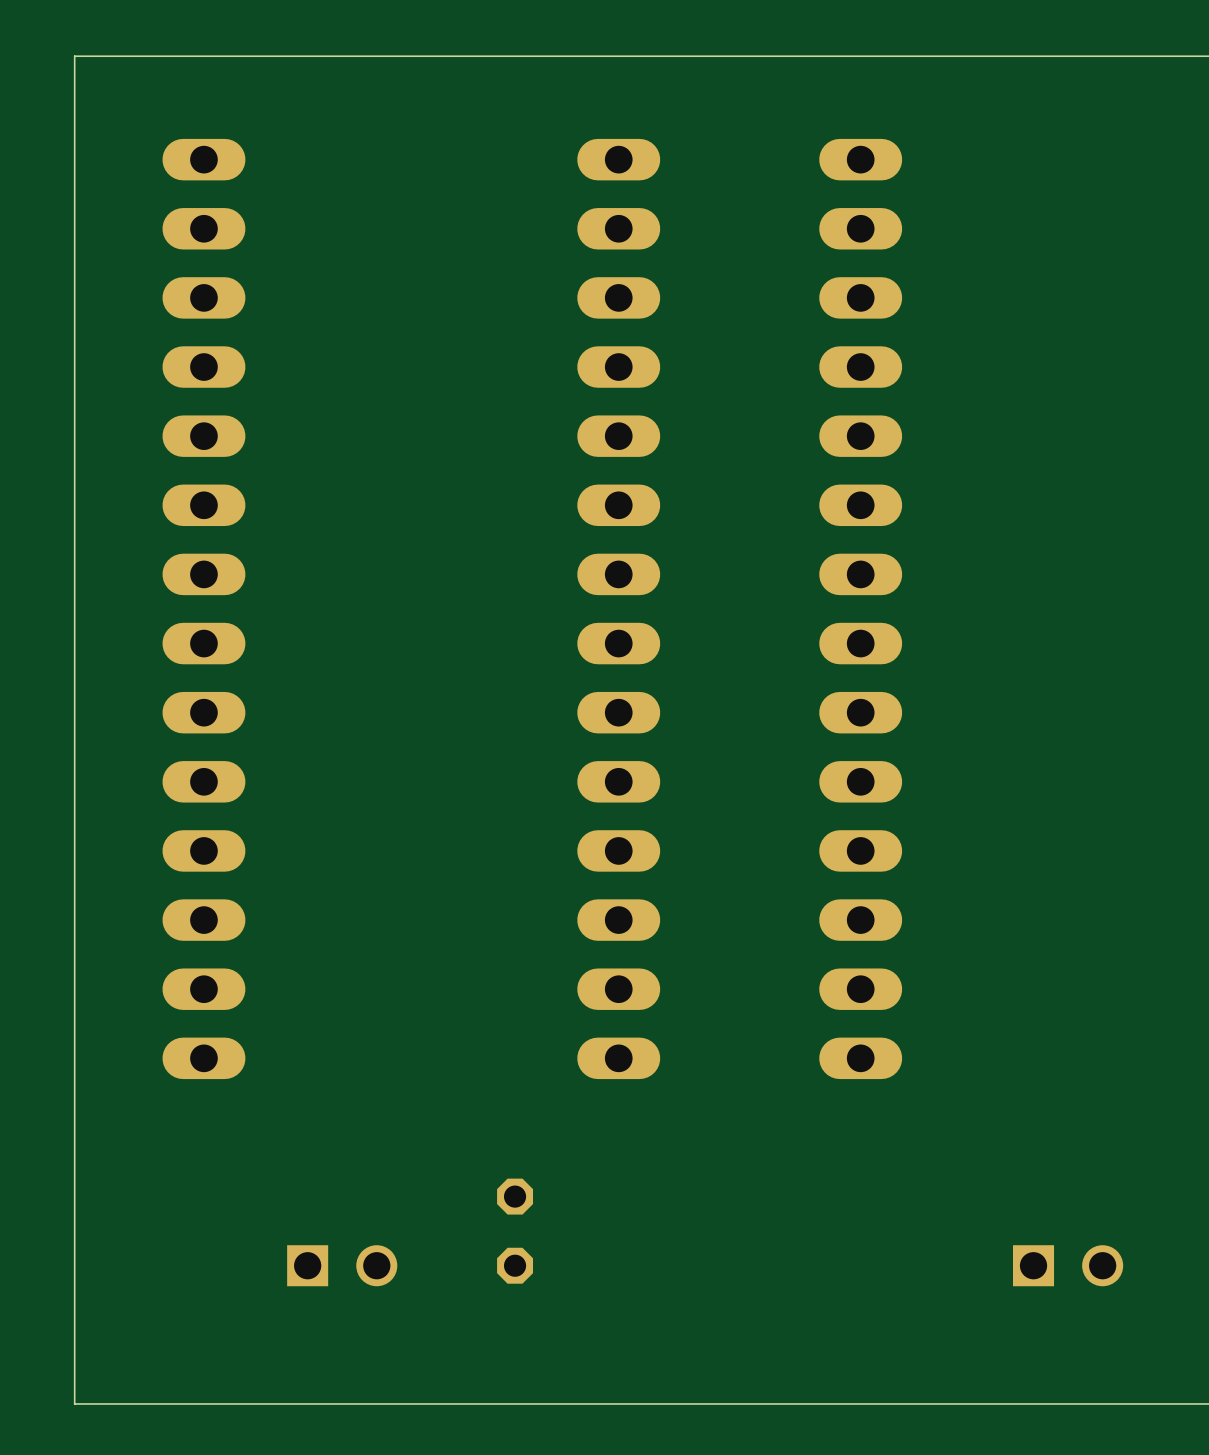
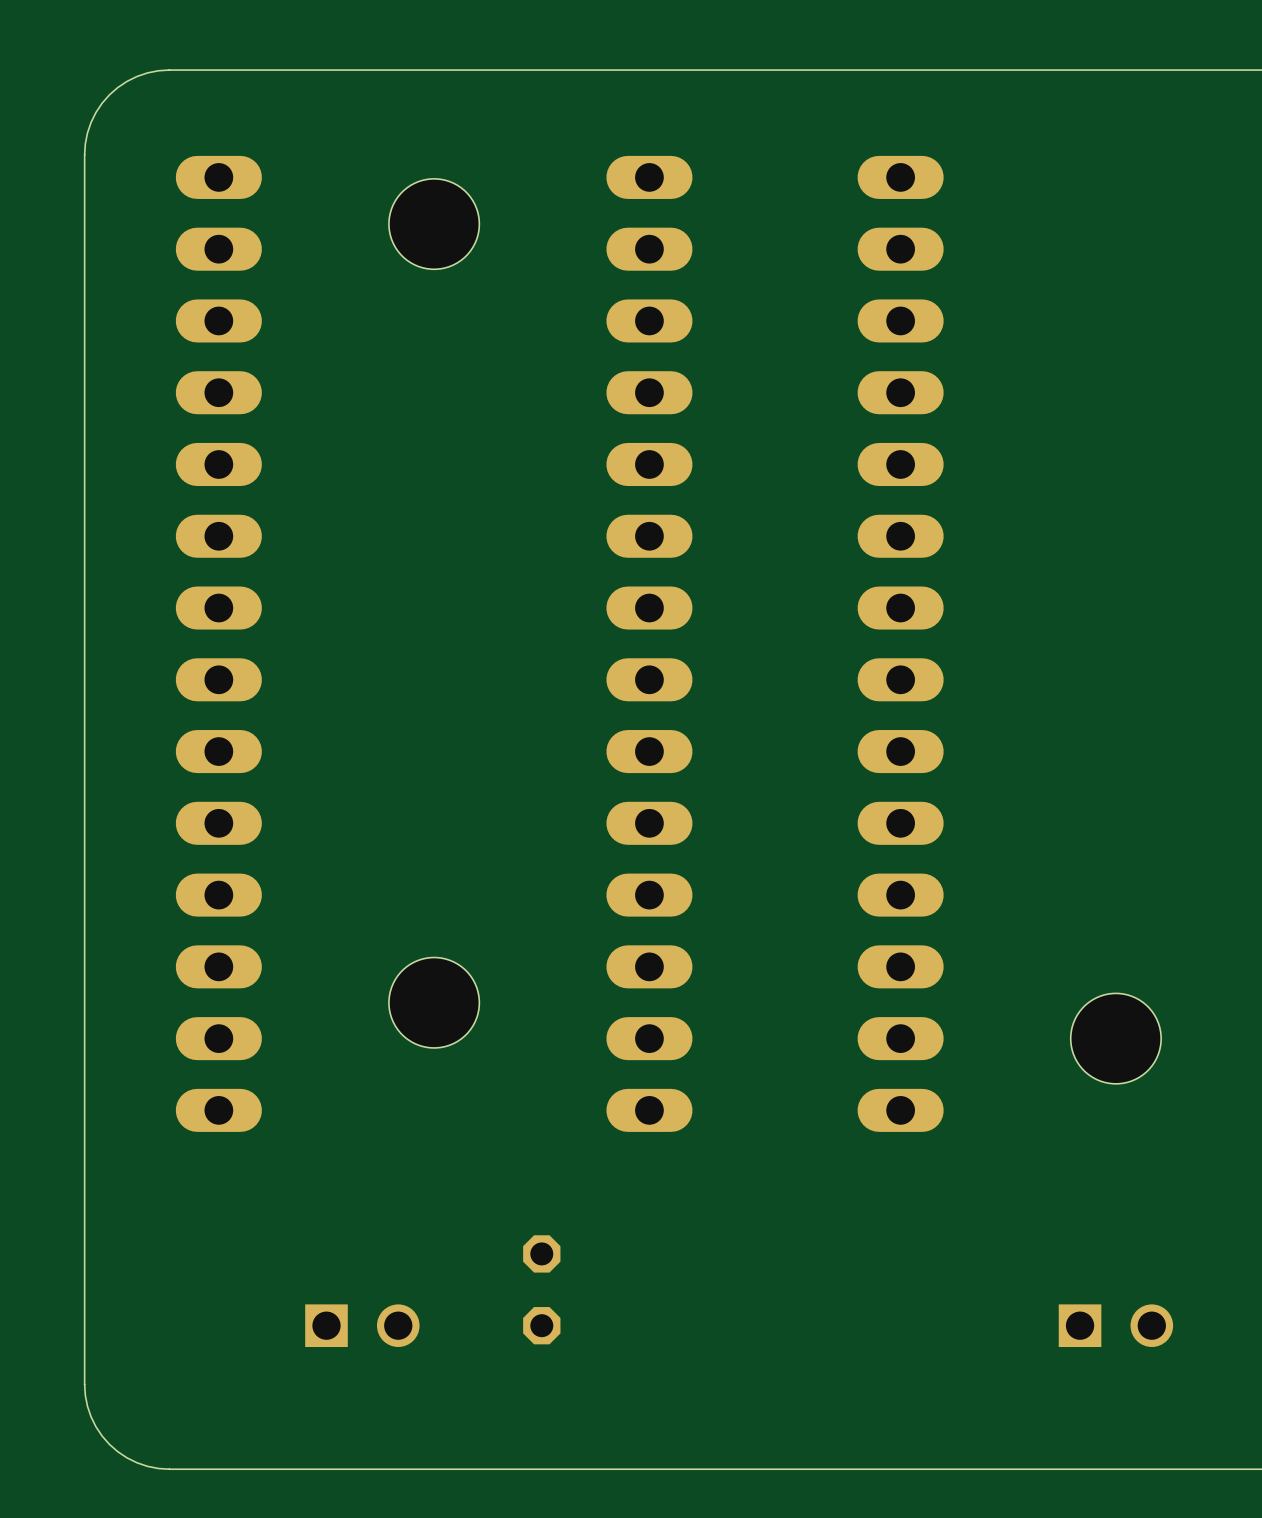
board edge: (156, 56) (74, 56) (74, 137) -> (169, 70) (136, 76) (109, 94) (91, 122) (84, 154)
part: none -> (434, 224)
part: none -> (434, 1002)
part: none -> (1115, 1038)
board edge: (74, 1322) (74, 1403) (156, 1403) -> (84, 1384) (91, 1416) (109, 1444) (136, 1462) (169, 1469)

